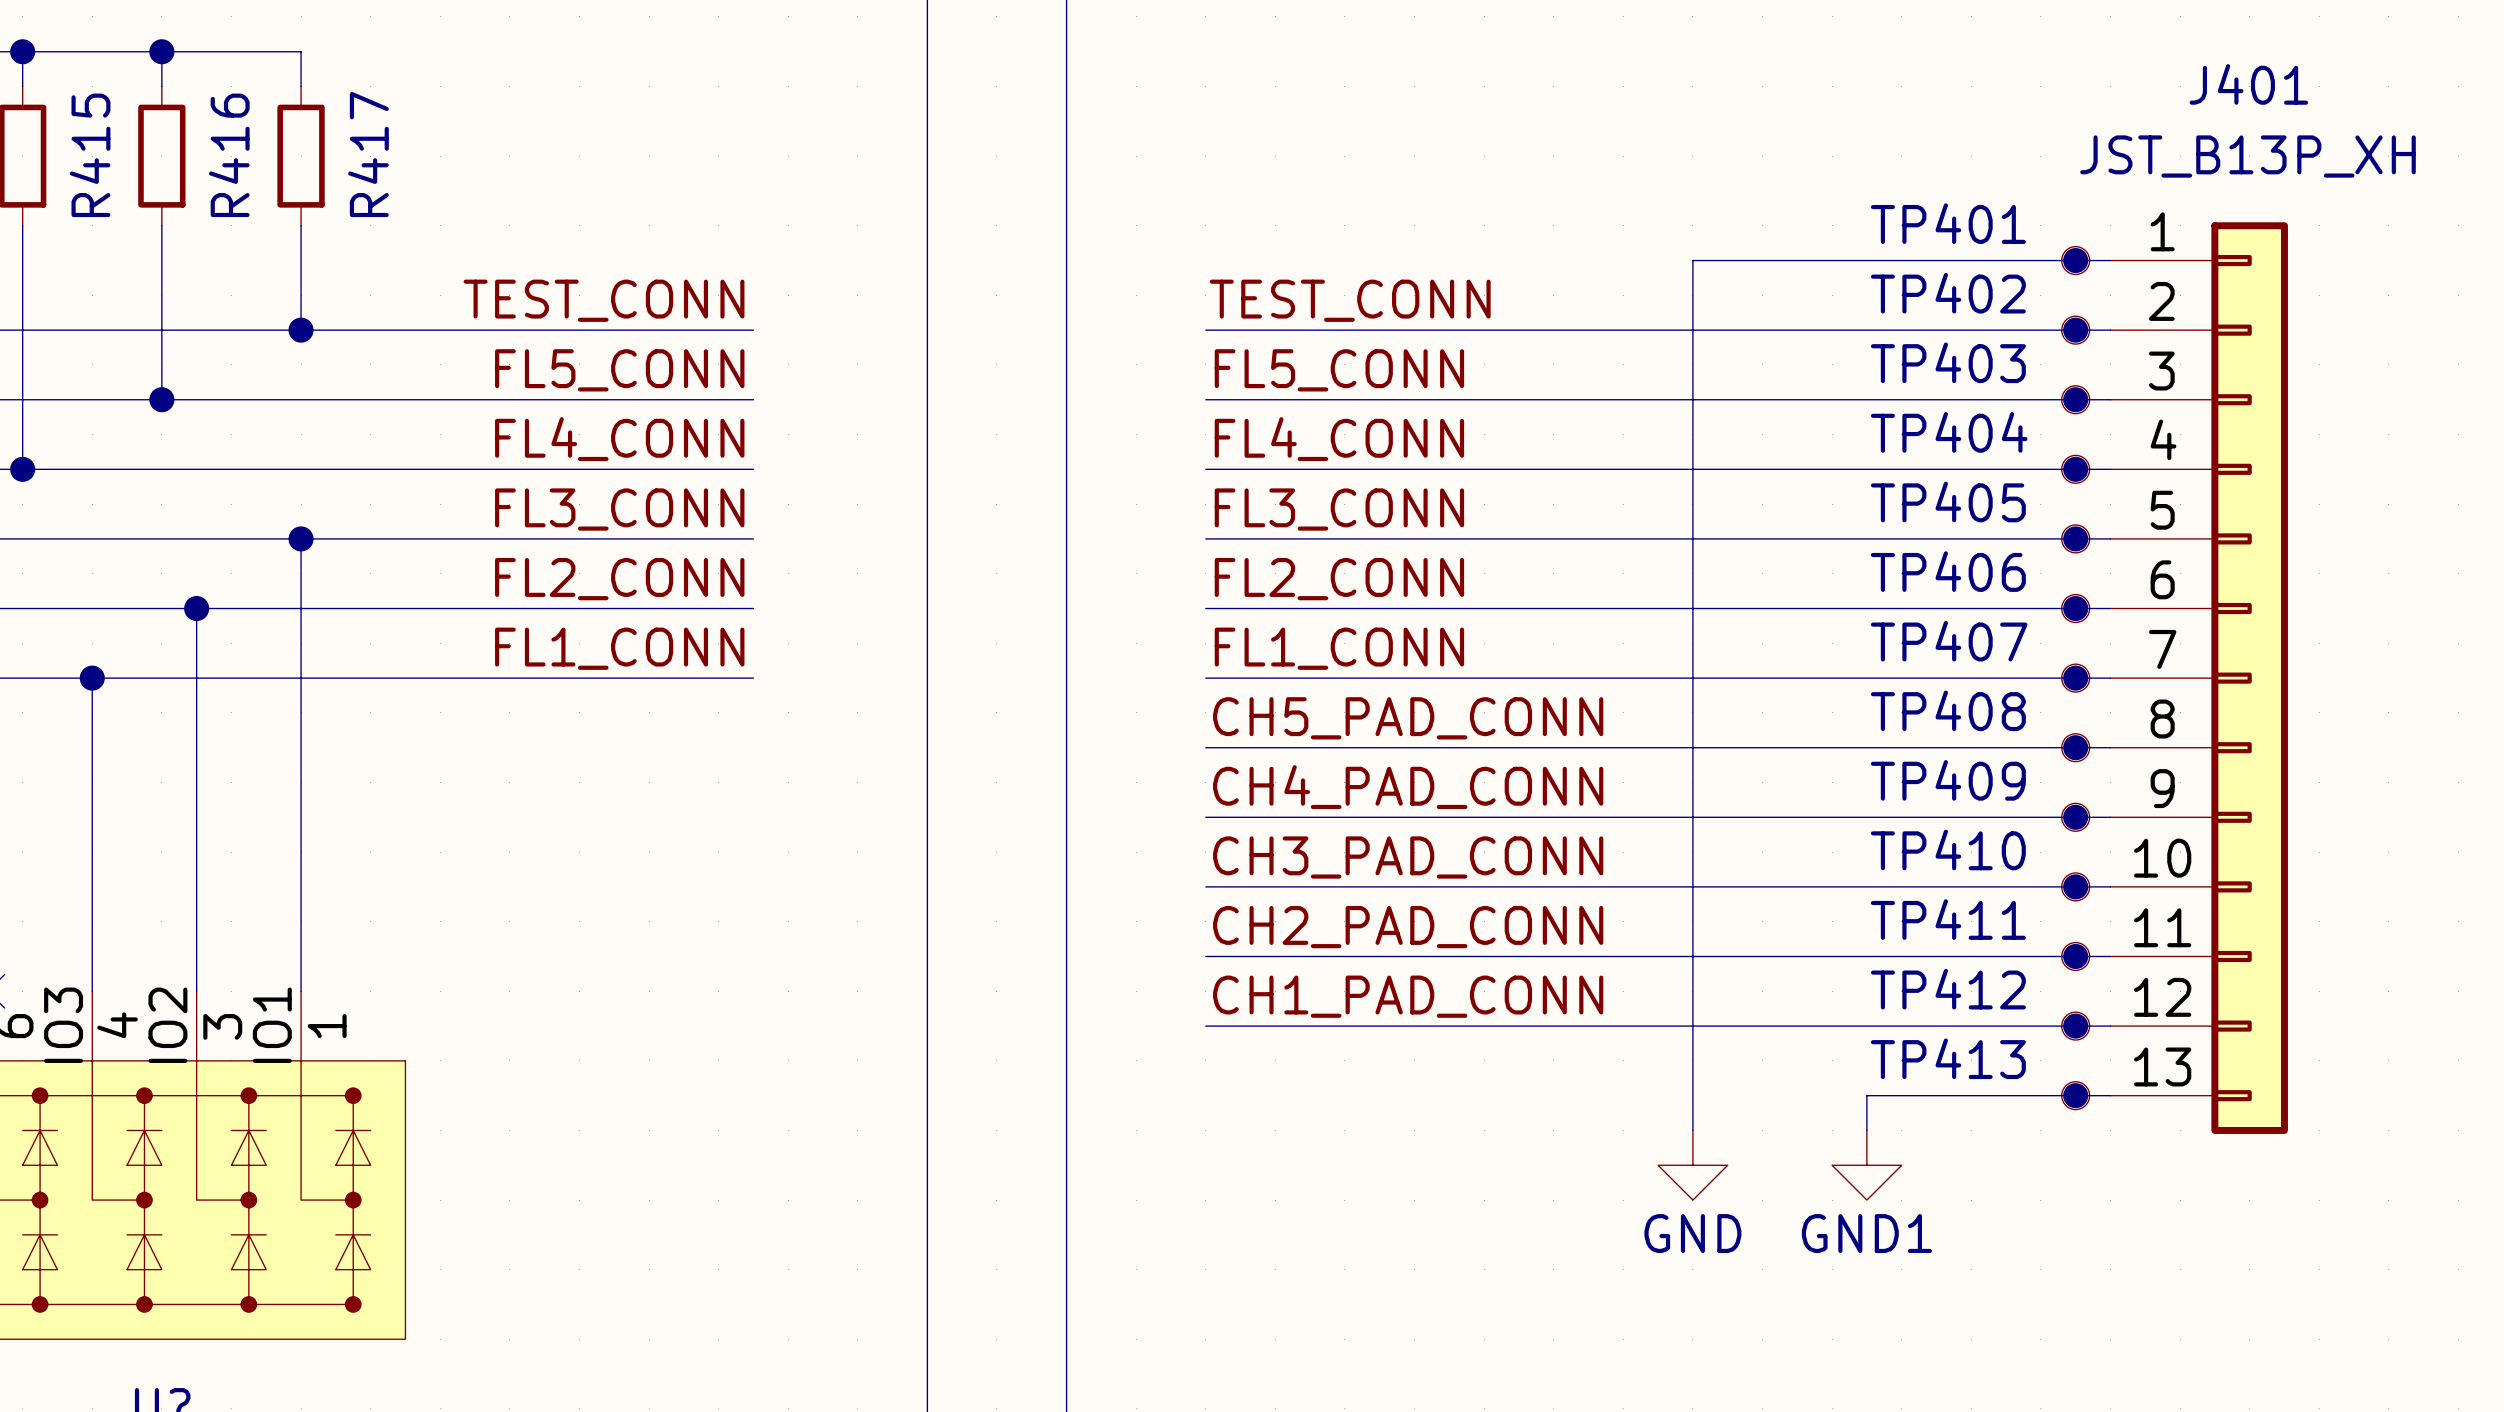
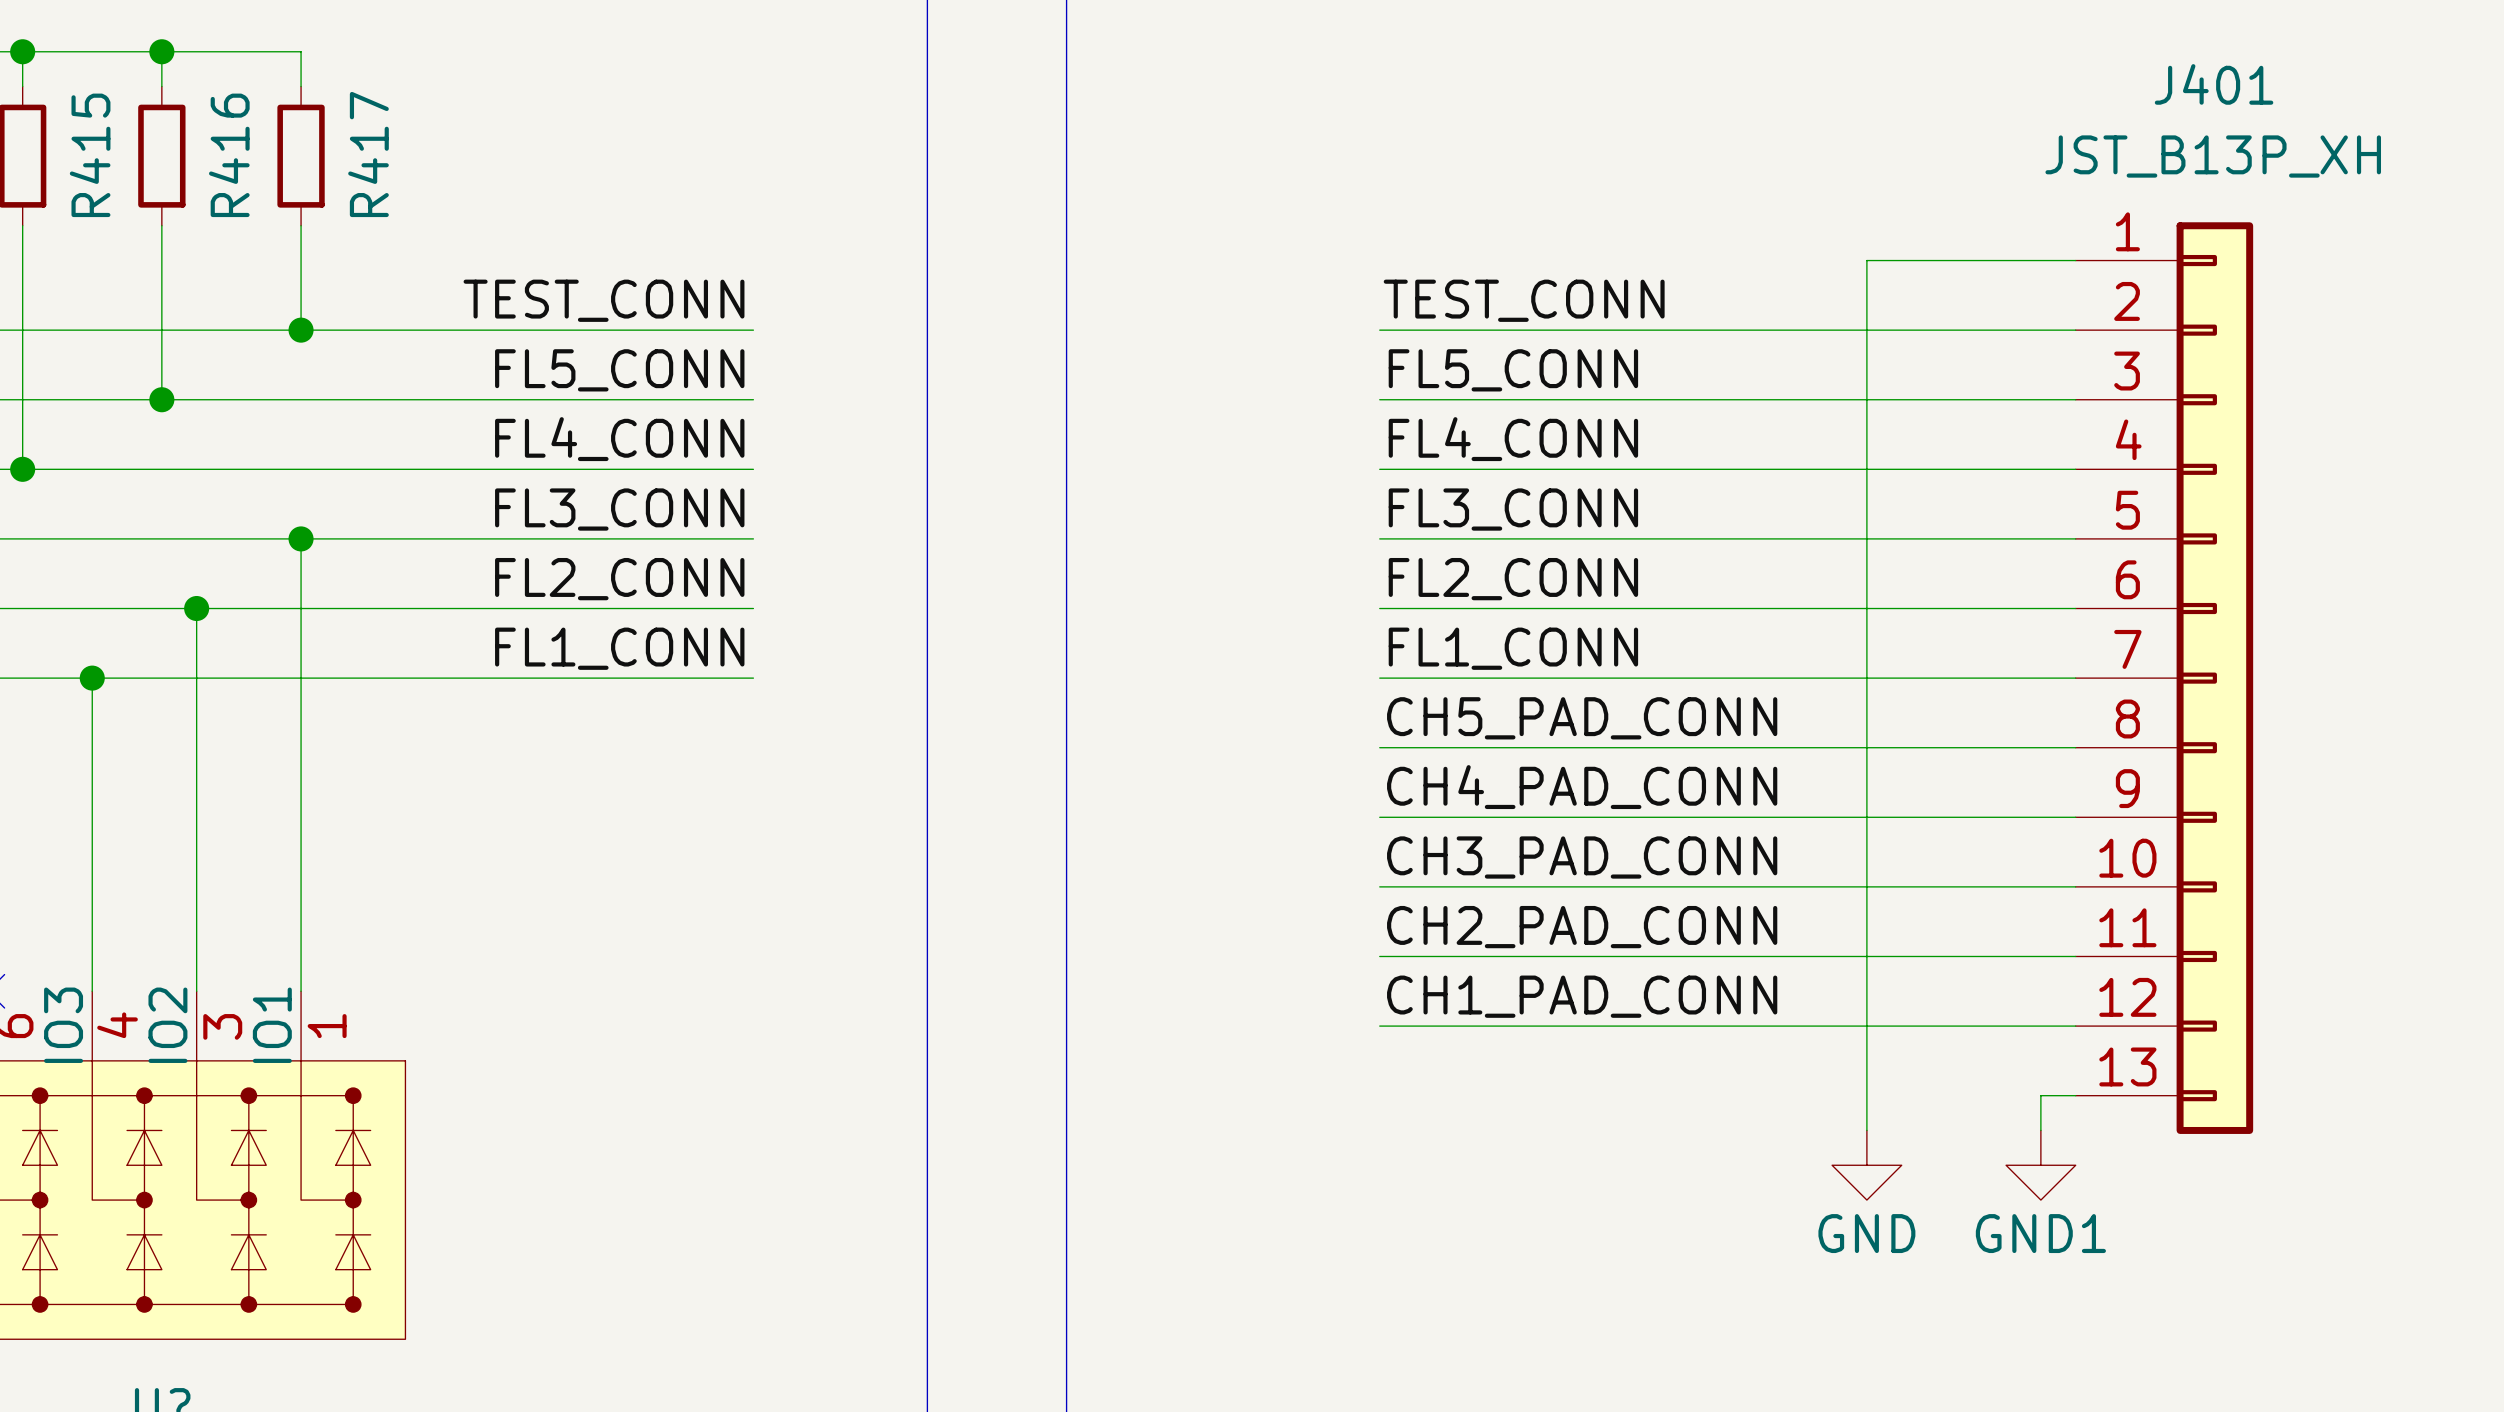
wire: (1866, 260) (1692, 260) (1692, 1130) -> (1866, 260) (1866, 1095)
junction: (2075, 260) -> none
TP401: (2075, 260) -> none
label position: TEST_CONN (1350, 300) -> TEST_CONN (1524, 300)
wire: (1205, 330) (1379, 330) -> none
junction: (2075, 330) -> none
TP402: (2075, 330) -> none
label position: FL5_CONN (1339, 370) -> FL5_CONN (1513, 370)
wire: (1205, 399) (1379, 399) -> none
junction: (2075, 399) -> none
TP403: (2075, 399) -> none
label position: FL4_CONN (1339, 439) -> FL4_CONN (1513, 439)
wire: (1205, 469) (1379, 469) -> none
junction: (2075, 469) -> none
TP404: (2075, 469) -> none
label position: FL3_CONN (1339, 509) -> FL3_CONN (1513, 509)
wire: (1205, 538) (1379, 538) -> none
junction: (2075, 538) -> none
TP405: (2075, 538) -> none
label position: FL2_CONN (1339, 579) -> FL2_CONN (1513, 579)
wire: (1205, 608) (1379, 608) -> none
junction: (2075, 608) -> none
TP406: (2075, 608) -> none
label position: FL1_CONN (1339, 648) -> FL1_CONN (1513, 648)
wire: (1205, 678) (1379, 678) -> none
junction: (2075, 678) -> none
TP407: (2075, 678) -> none
J401 position: (2199, 678) -> (2164, 678)
label position: CH5_PAD_CONN (1408, 718) -> CH5_PAD_CONN (1582, 718)
wire: (1205, 747) (1379, 747) -> none
junction: (2075, 747) -> none
TP408: (2075, 747) -> none
label position: CH4_PAD_CONN (1408, 787) -> CH4_PAD_CONN (1582, 787)
wire: (1205, 817) (1379, 817) -> none
junction: (2075, 817) -> none
TP409: (2075, 817) -> none
label position: CH3_PAD_CONN (1408, 857) -> CH3_PAD_CONN (1582, 857)
wire: (1205, 886) (1379, 886) -> none
junction: (2075, 886) -> none
TP410: (2075, 886) -> none
label position: CH2_PAD_CONN (1408, 927) -> CH2_PAD_CONN (1582, 927)
wire: (1205, 956) (1379, 956) -> none
junction: (2075, 956) -> none
TP411: (2075, 956) -> none
label position: CH1_PAD_CONN (1408, 996) -> CH1_PAD_CONN (1582, 996)
wire: (1205, 1026) (1379, 1026) -> none
junction: (2075, 1026) -> none
TP412: (2075, 1026) -> none
wire: (1866, 1095) (2040, 1095) -> (2040, 1130) (2040, 1095)
junction: (2075, 1095) -> none
TP413: (2075, 1095) -> none
power symbol: GND (1692, 1165) -> none
power symbol: GND1 (1866, 1165) -> GND (1866, 1165)
power symbol: none -> GND1 (2040, 1165)

